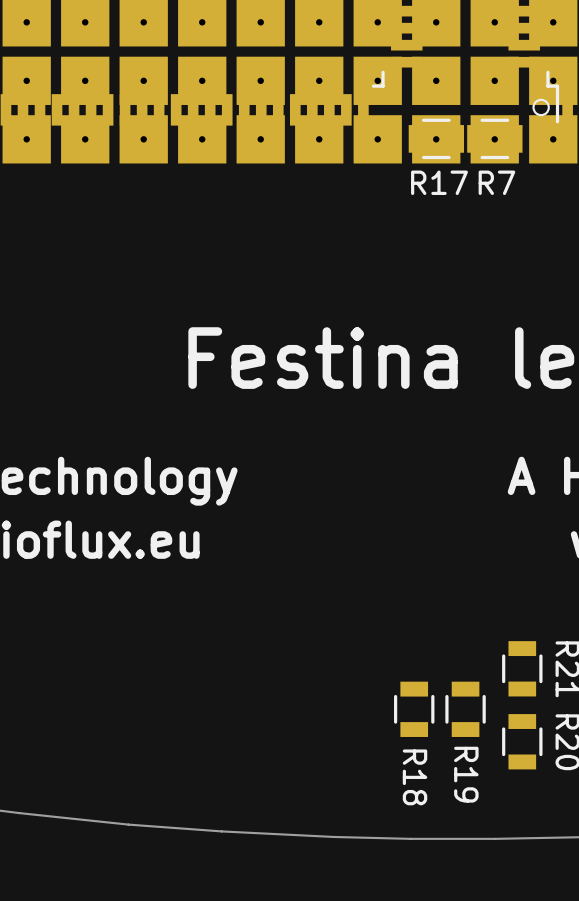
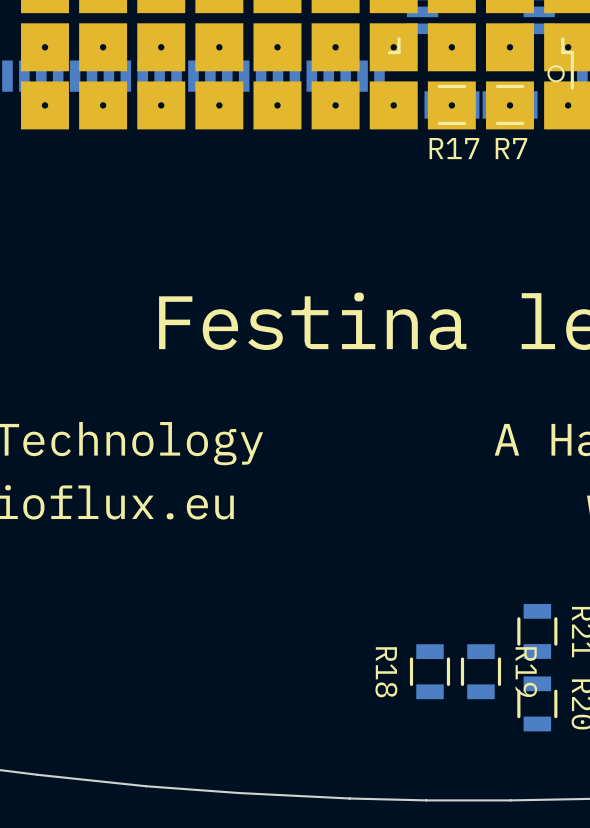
R19 name position: R19 (466, 774) -> R19 (526, 672)
R18 name position: R18 (415, 777) -> R18 (386, 672)

